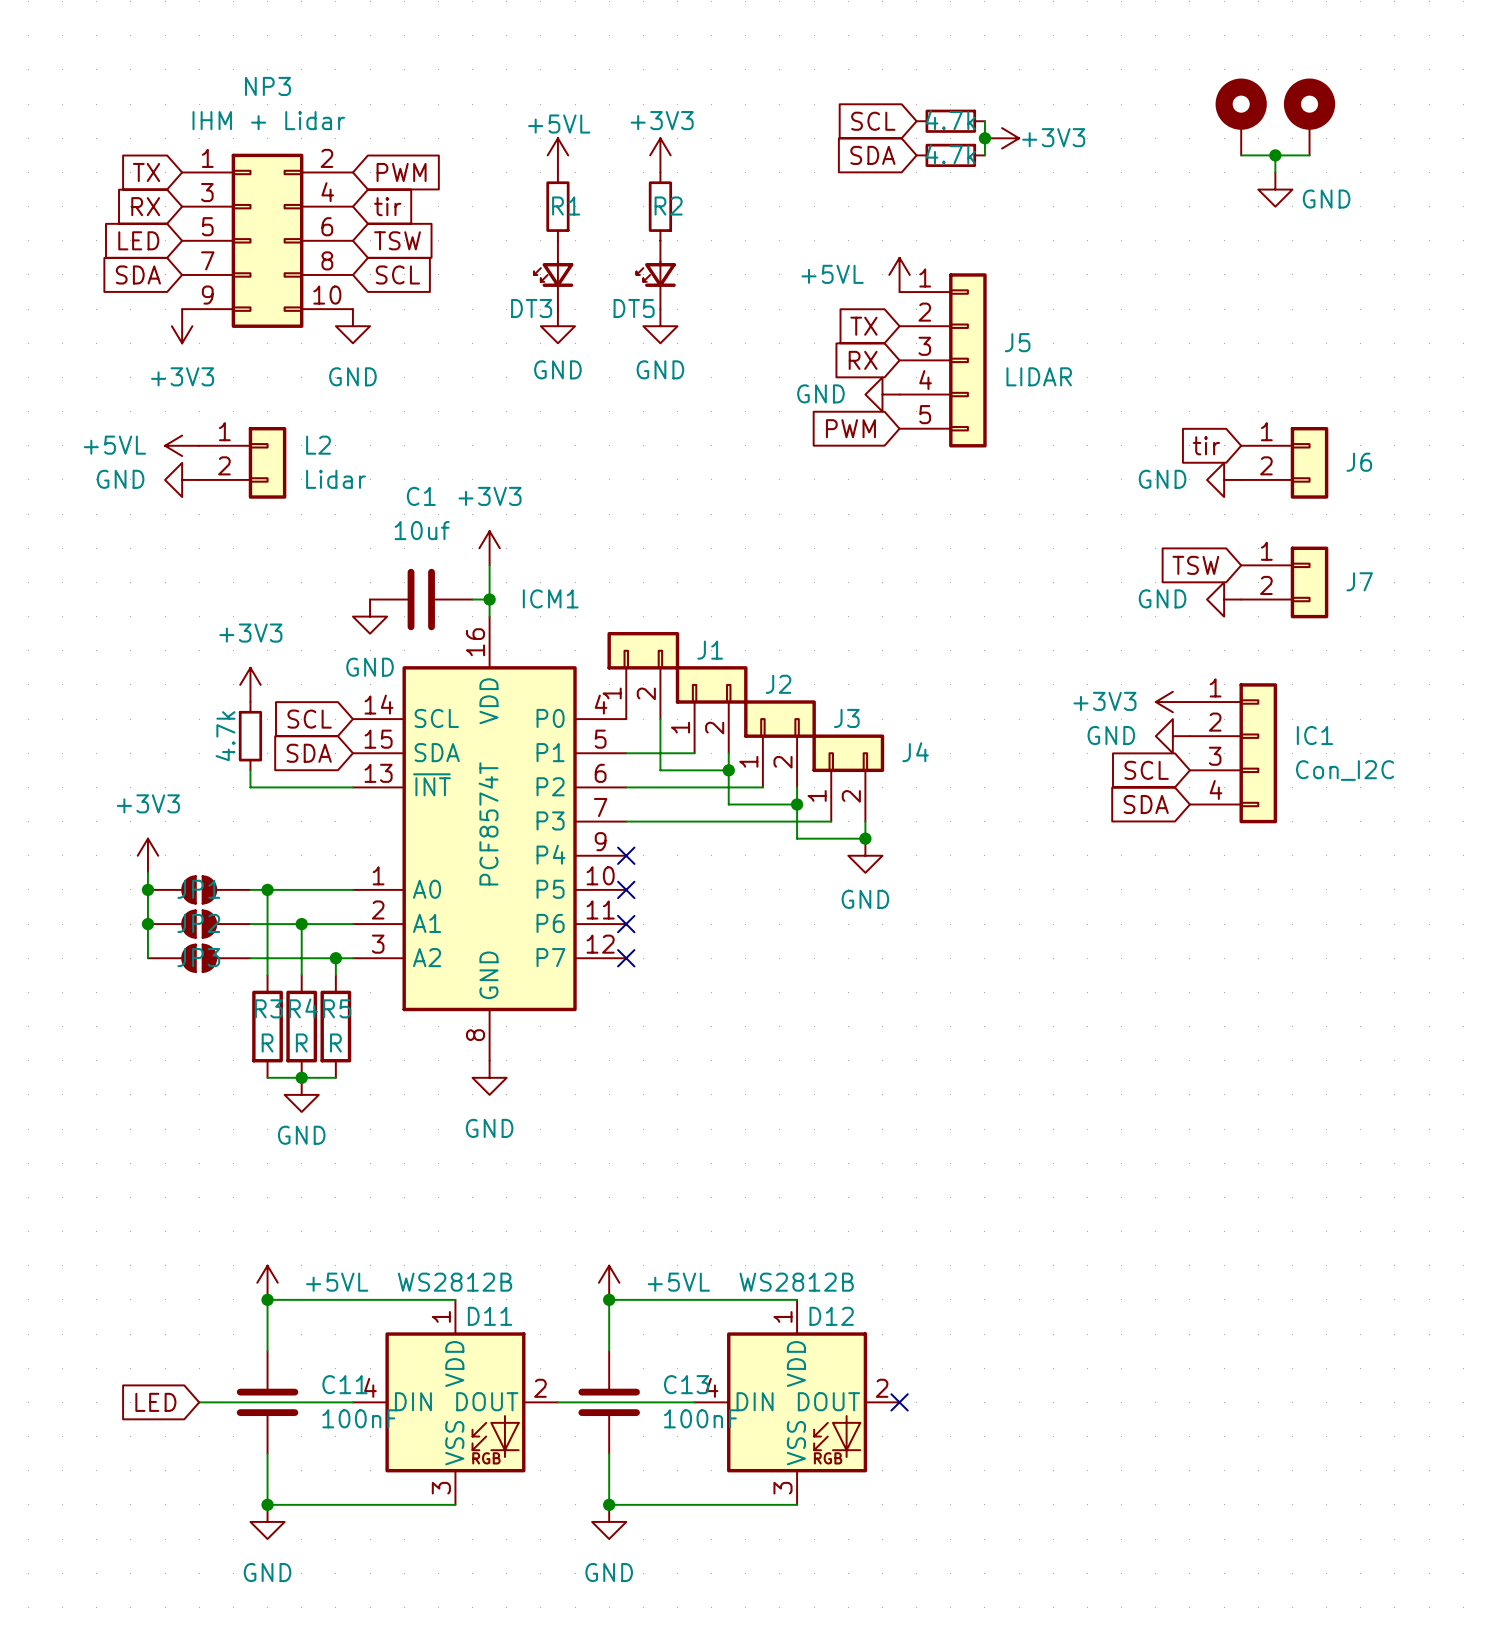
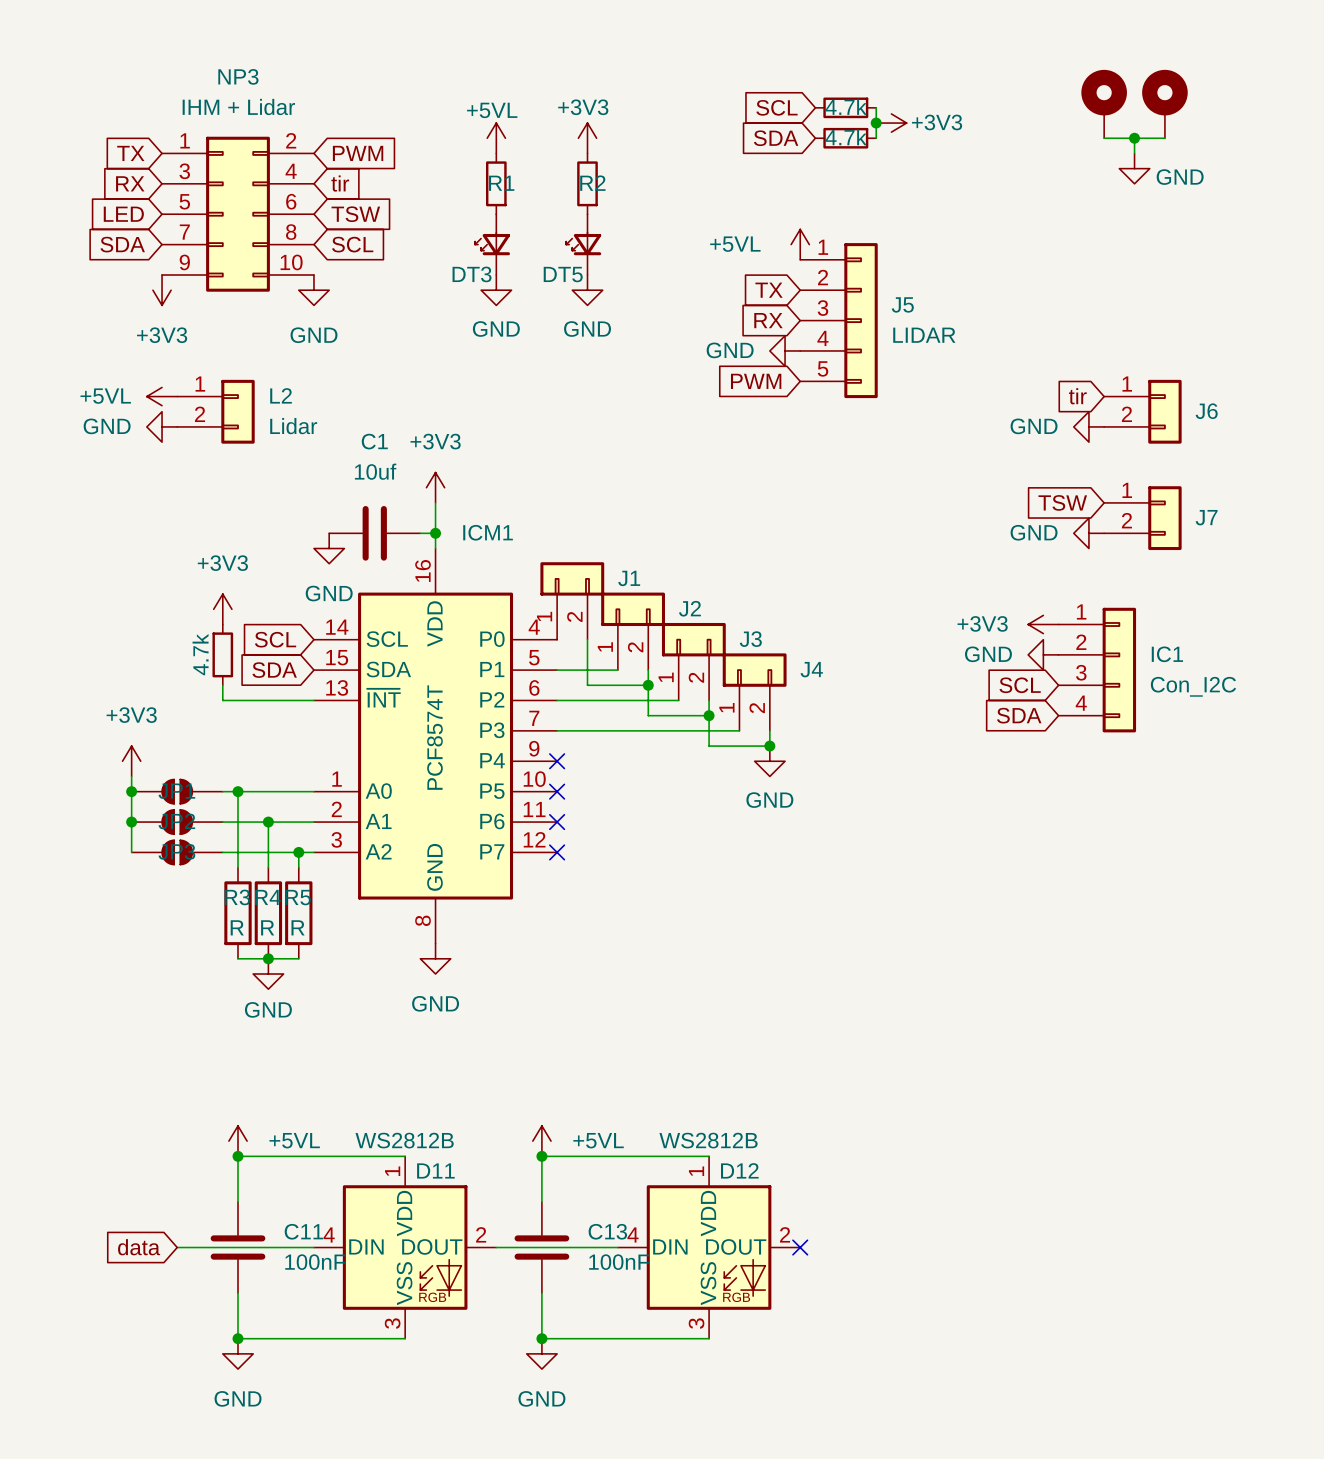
global label: LED (155, 1402) -> data (139, 1247)

